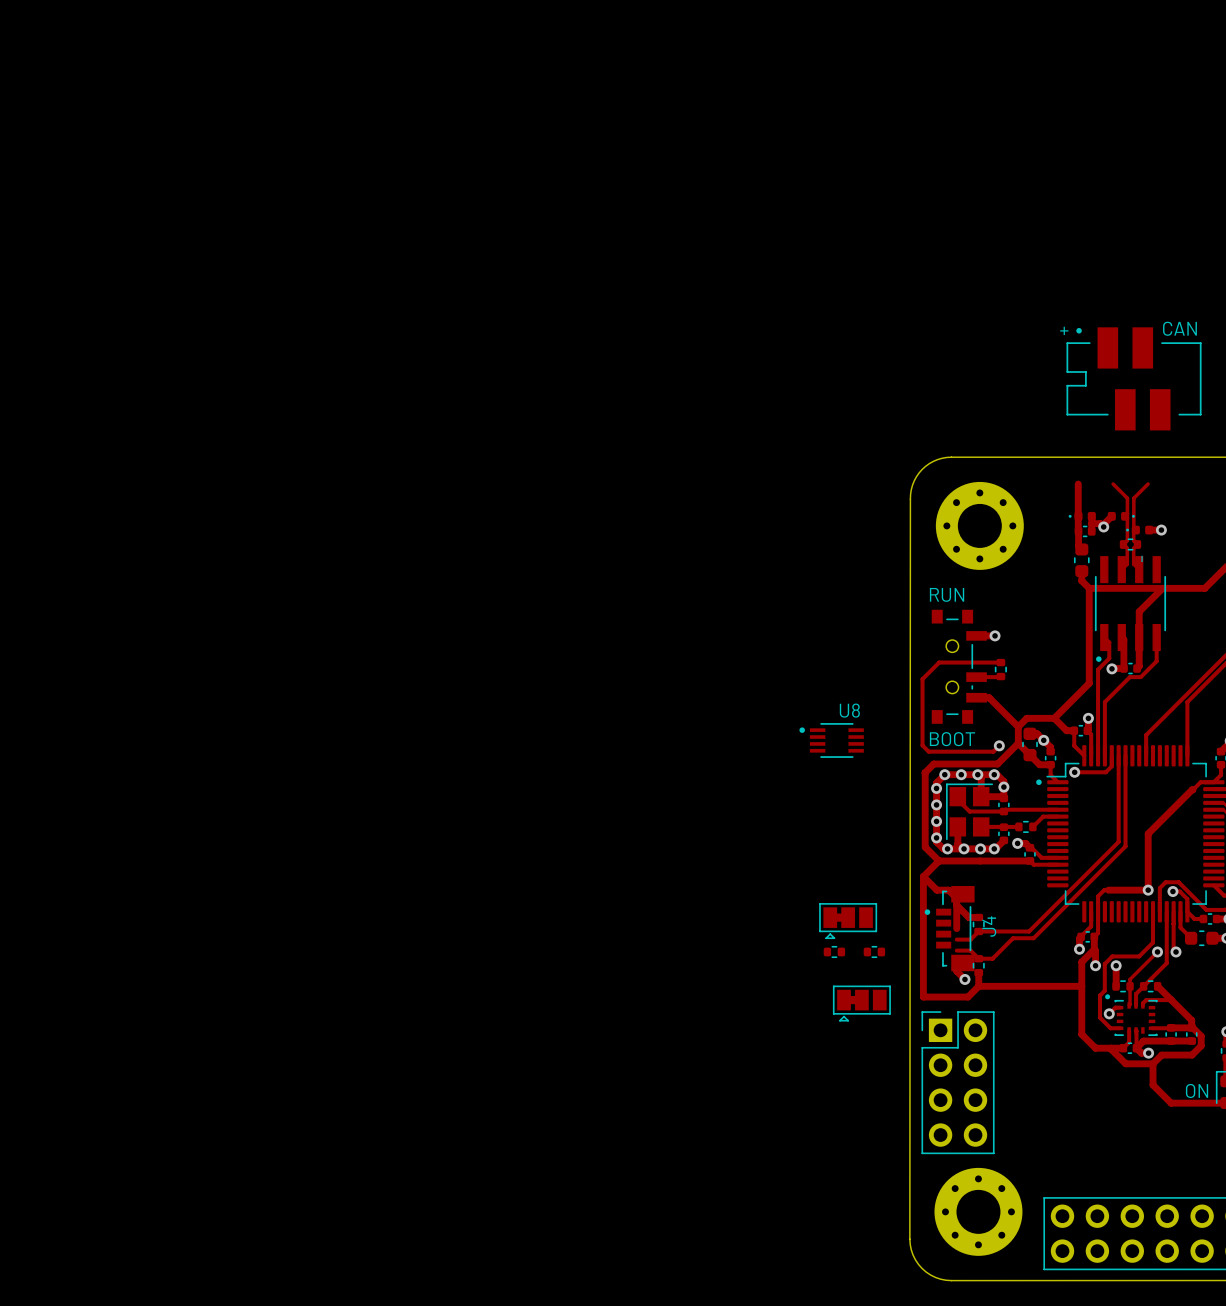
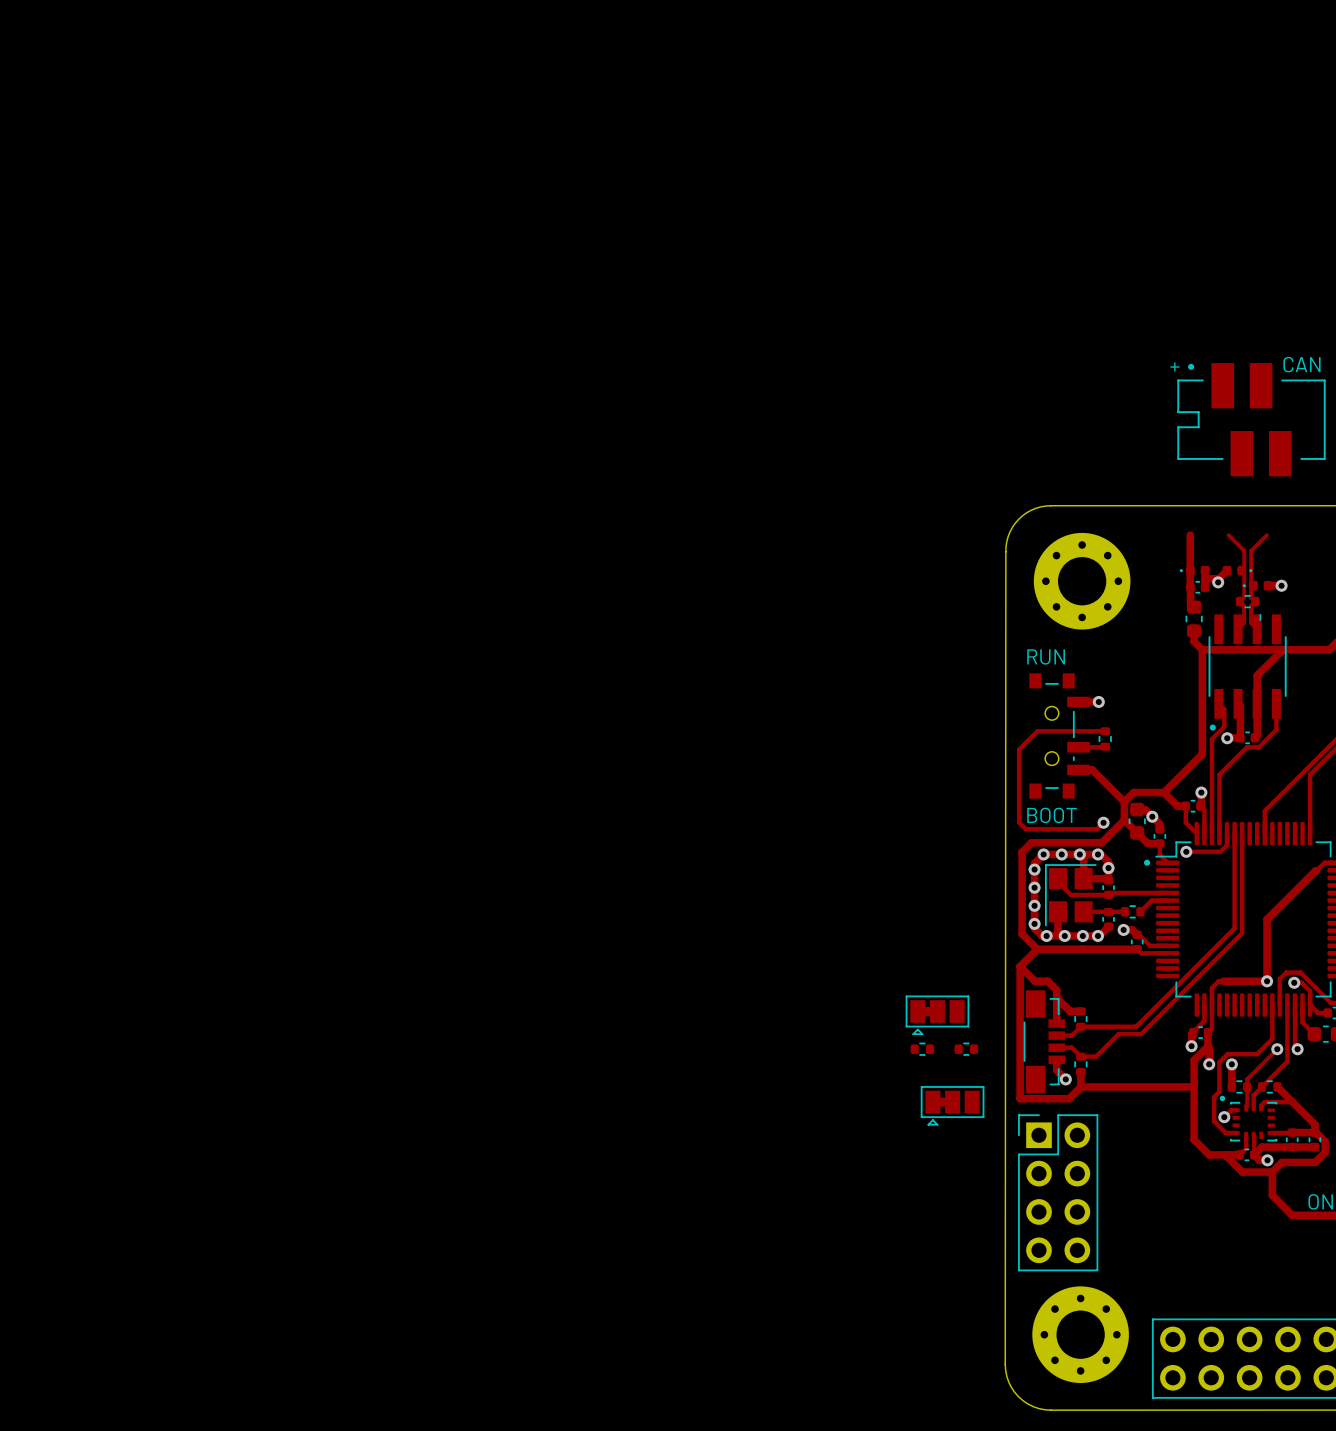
U8: (831, 740) -> none
J4: (949, 928) -> none
part: none -> (1044, 1041)

